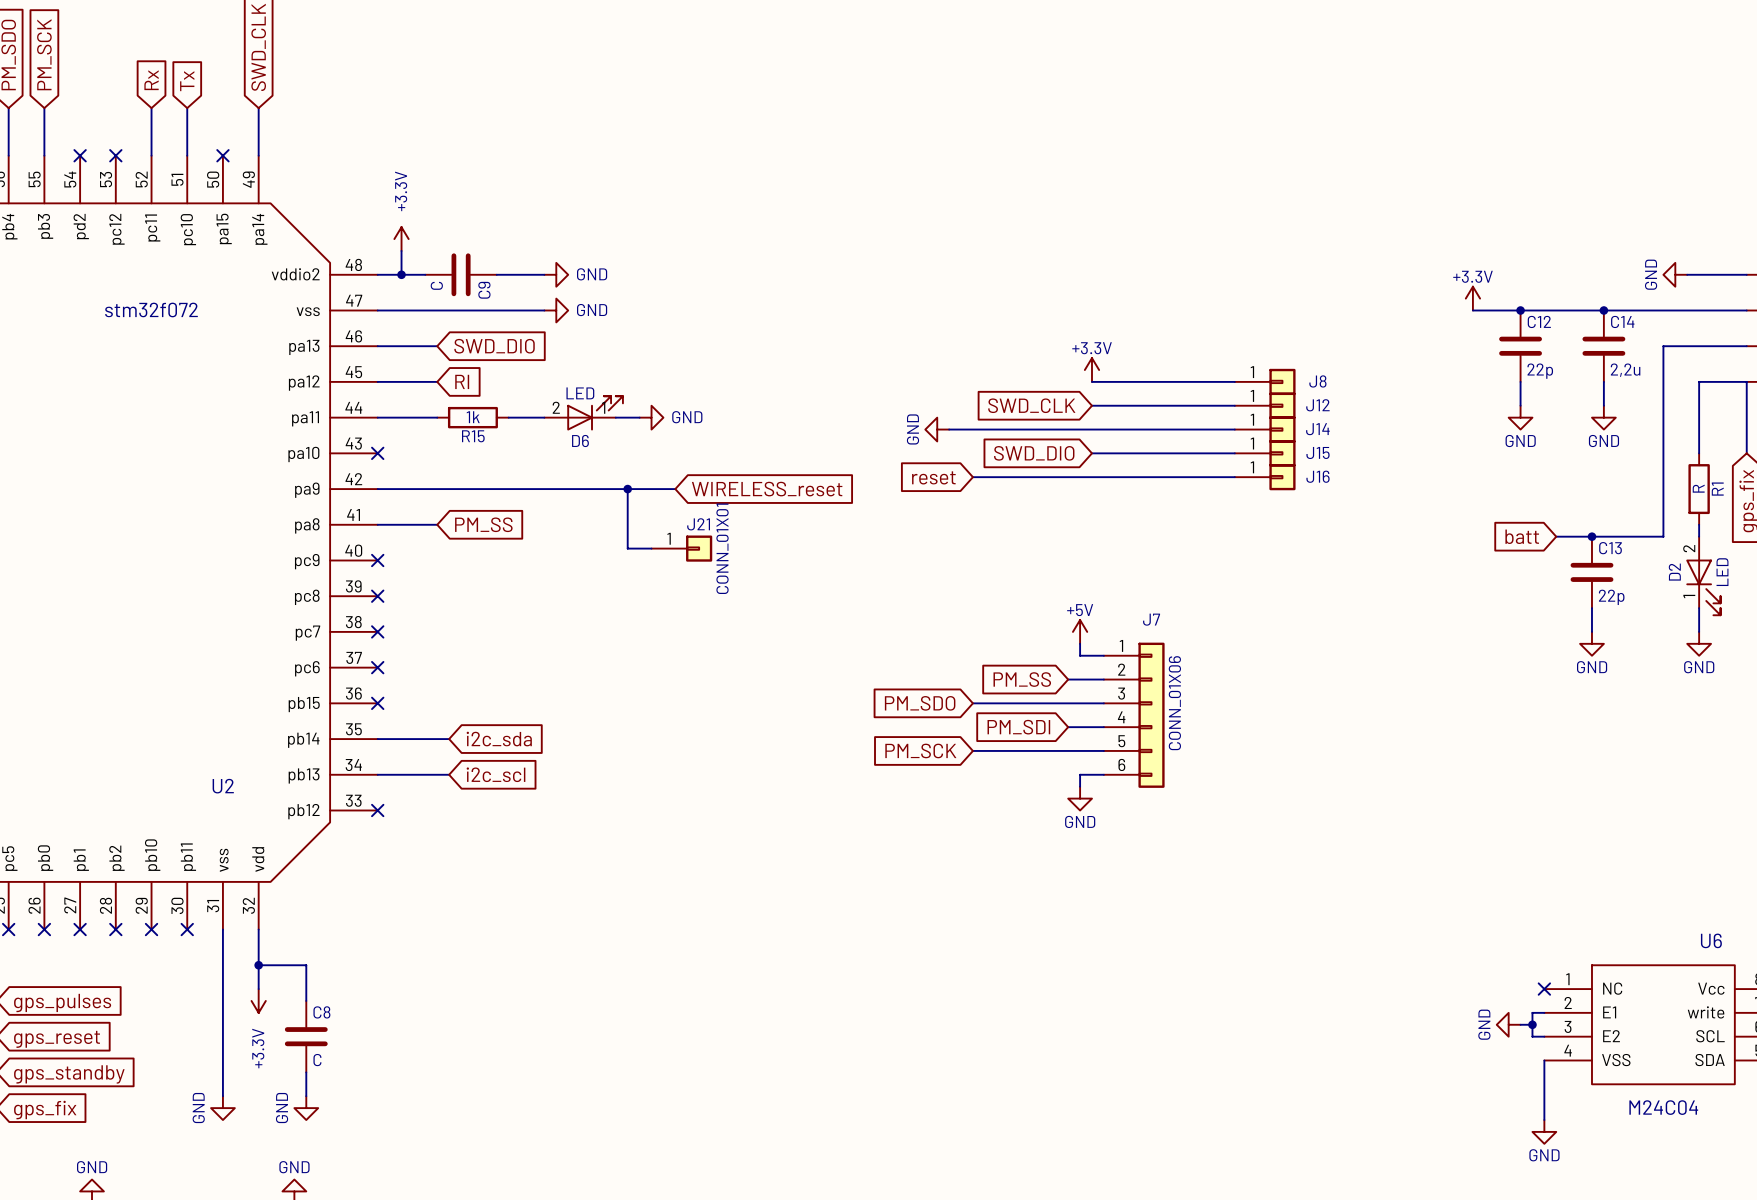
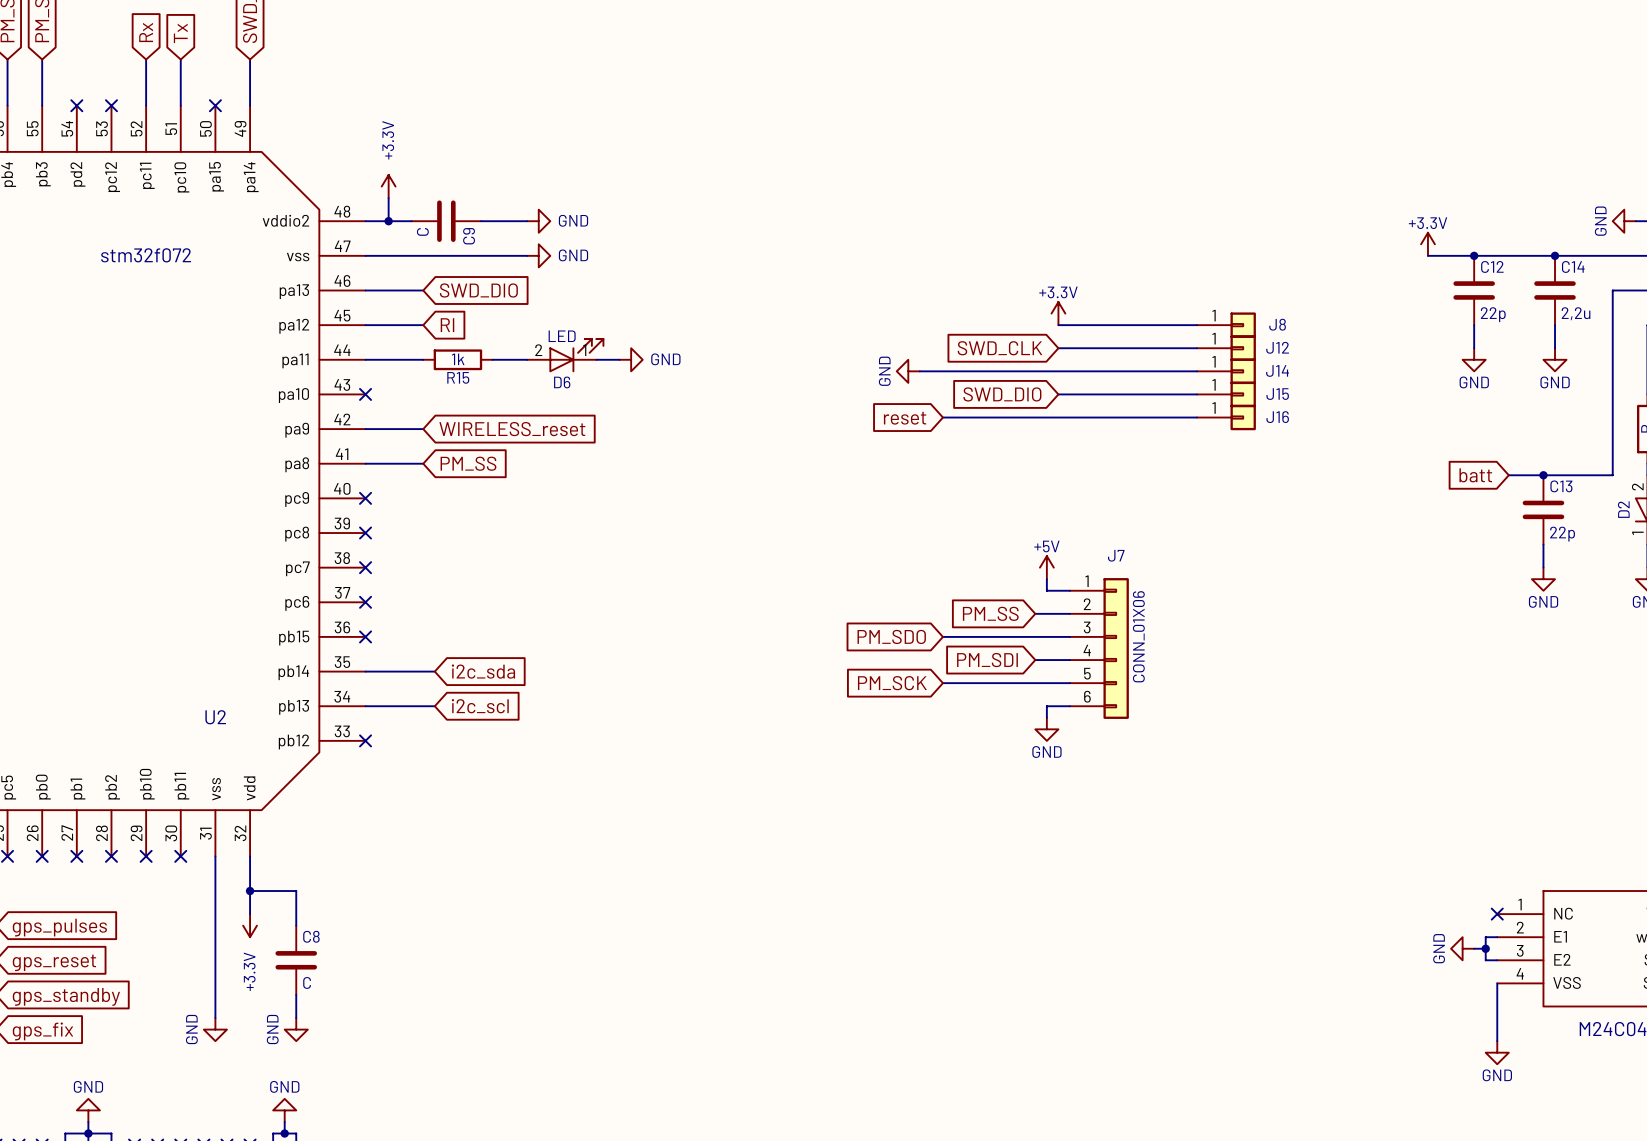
wire: (437, 489) (675, 489) -> none
global label: none -> WIRELESS_reset (512, 429)
wire: (627, 489) (627, 548) (651, 548) -> none
junction: (627, 489) -> none
global label: WIRELESS_reset (767, 489) -> none
J21: CONN_01X01 (681, 548) -> none

